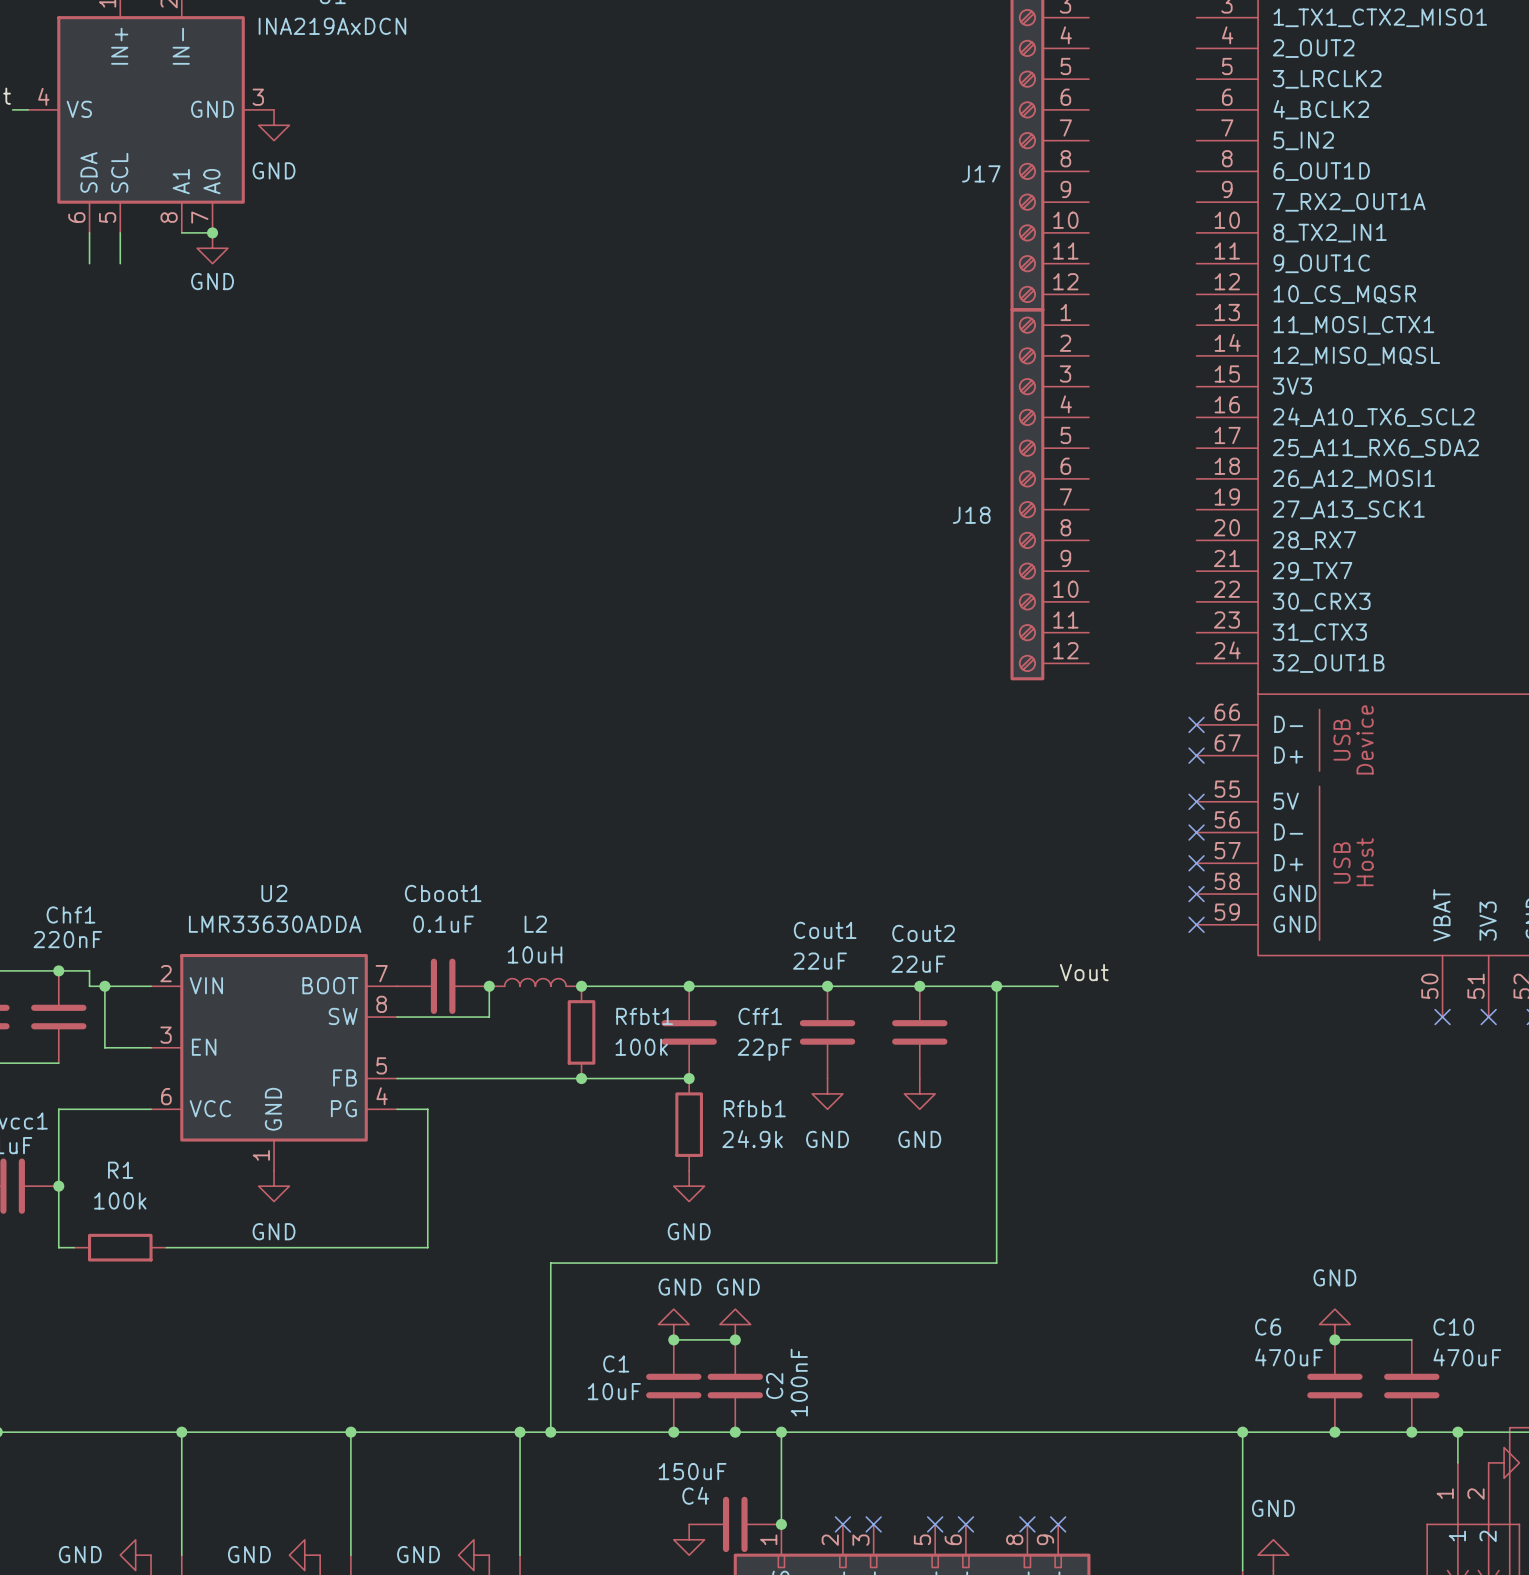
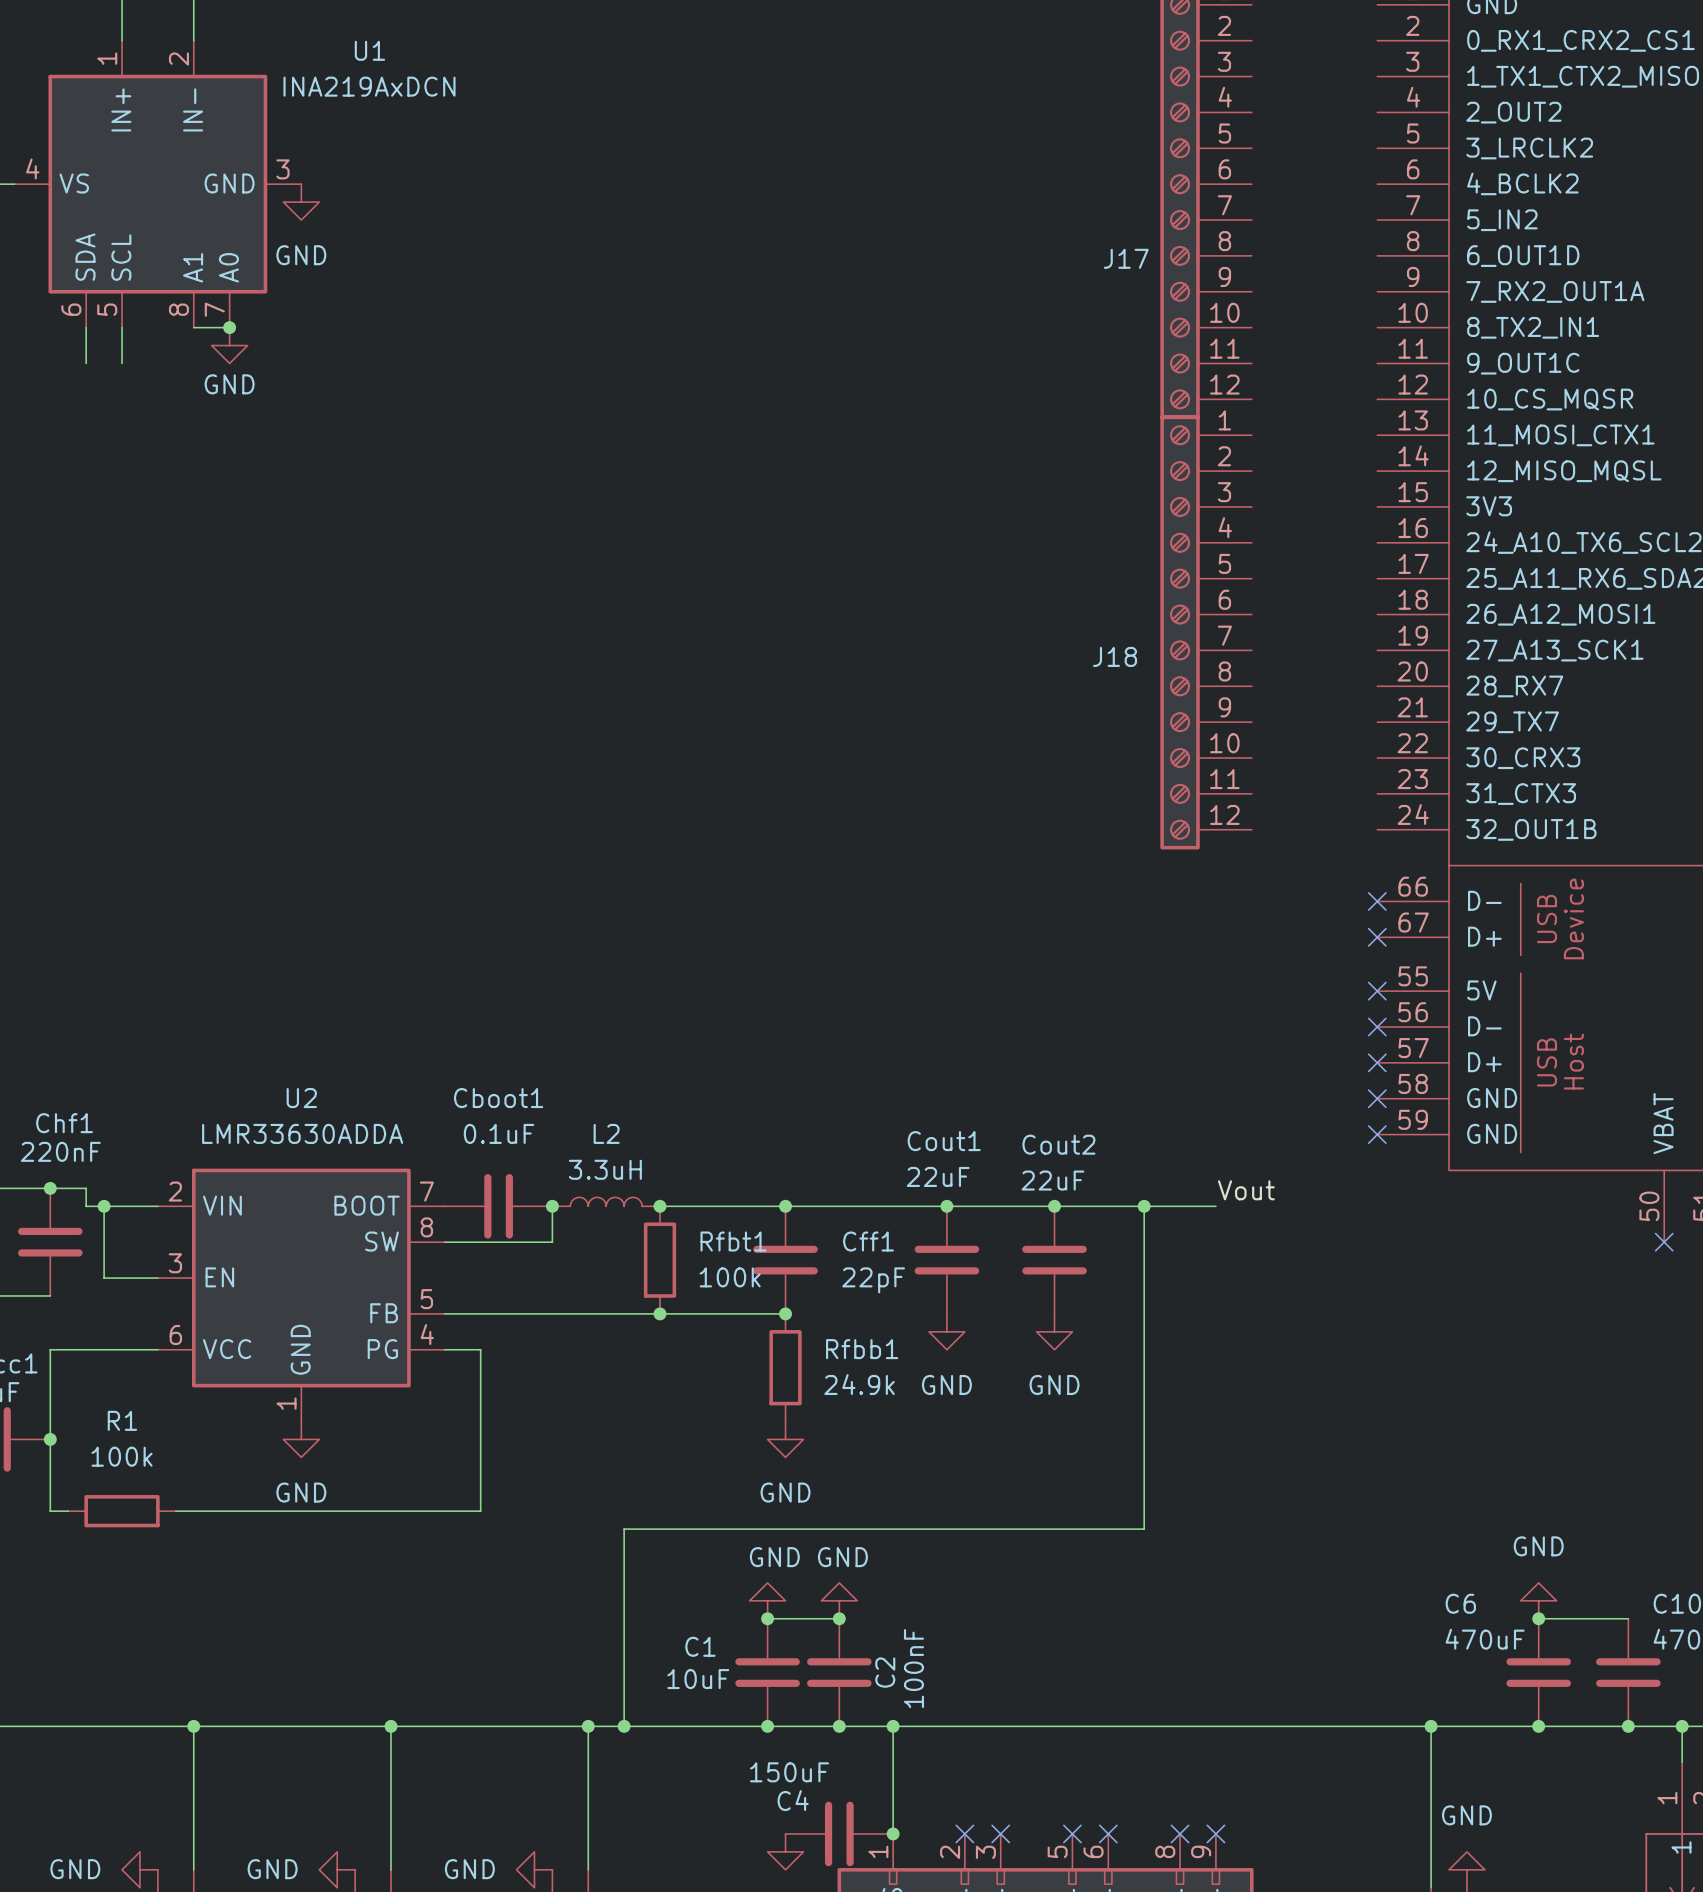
L2 value: 10uH (535, 954) -> 3.3uH (605, 1169)

